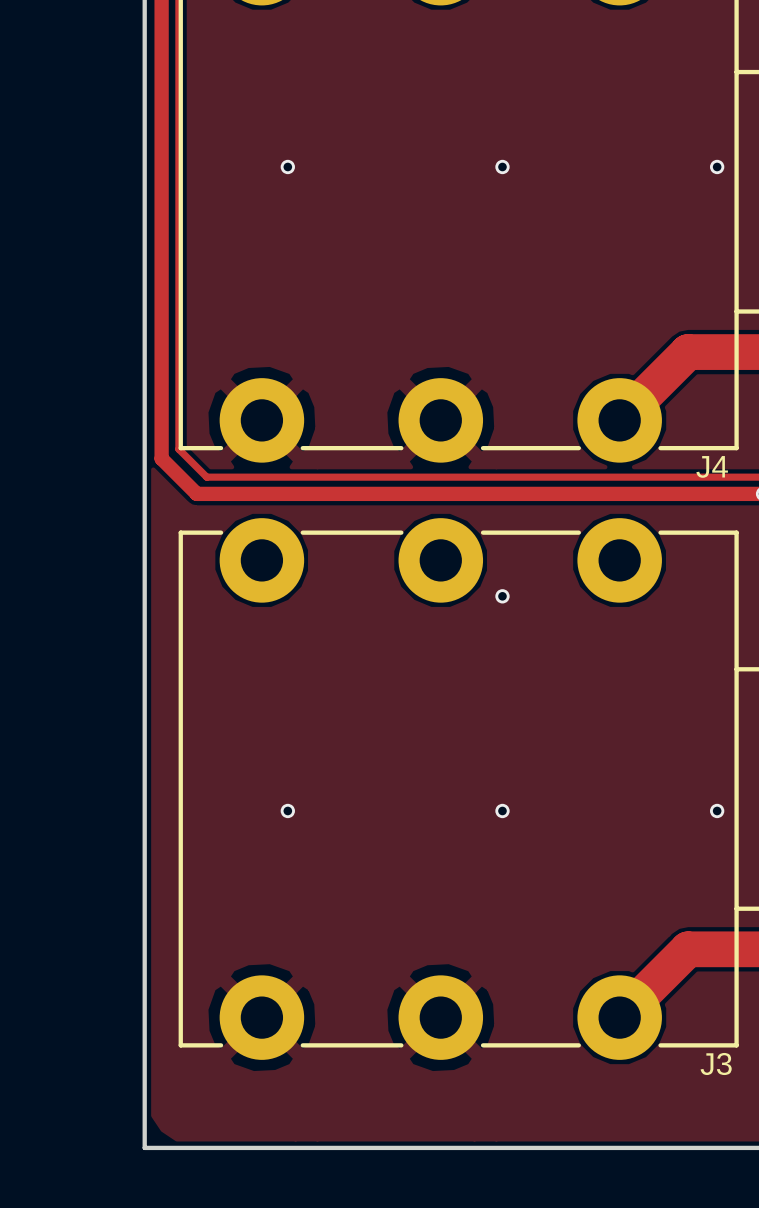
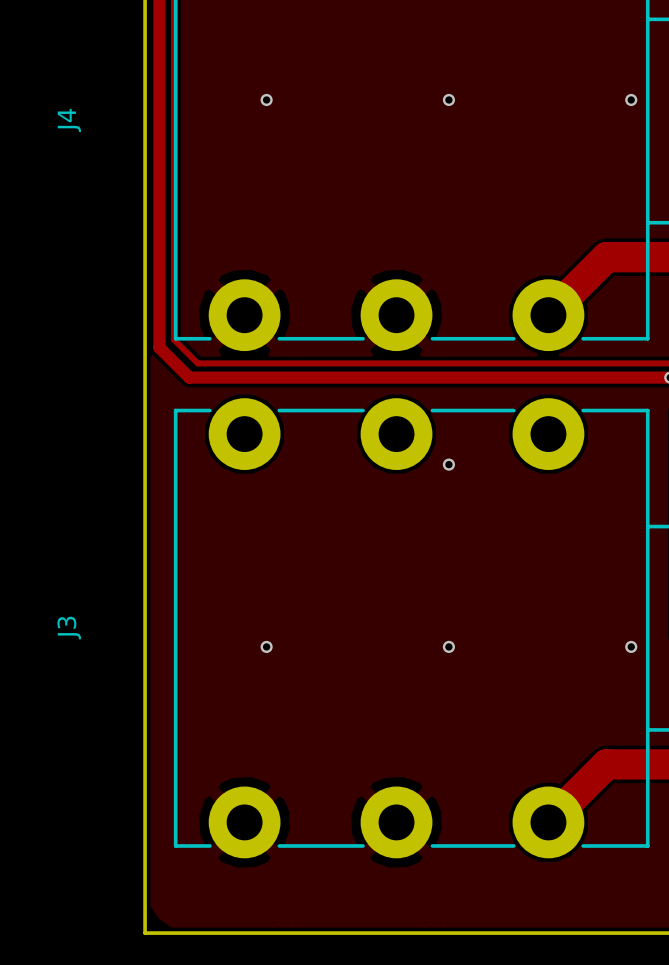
J4 name rotation: 0° (712, 466) -> 90° counterclockwise (69, 120)
J4 name position: J4 (712, 466) -> J4 (69, 120)
J3 name rotation: 0° (716, 1064) -> 90° counterclockwise (69, 627)
J3 name position: J3 (716, 1064) -> J3 (69, 627)

